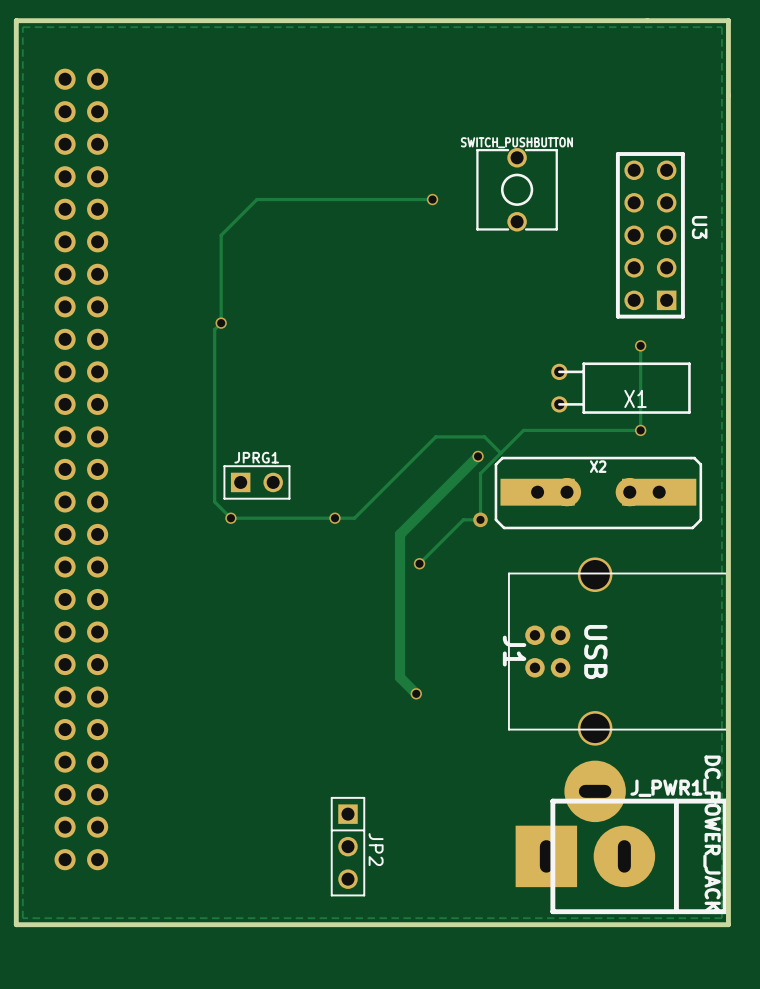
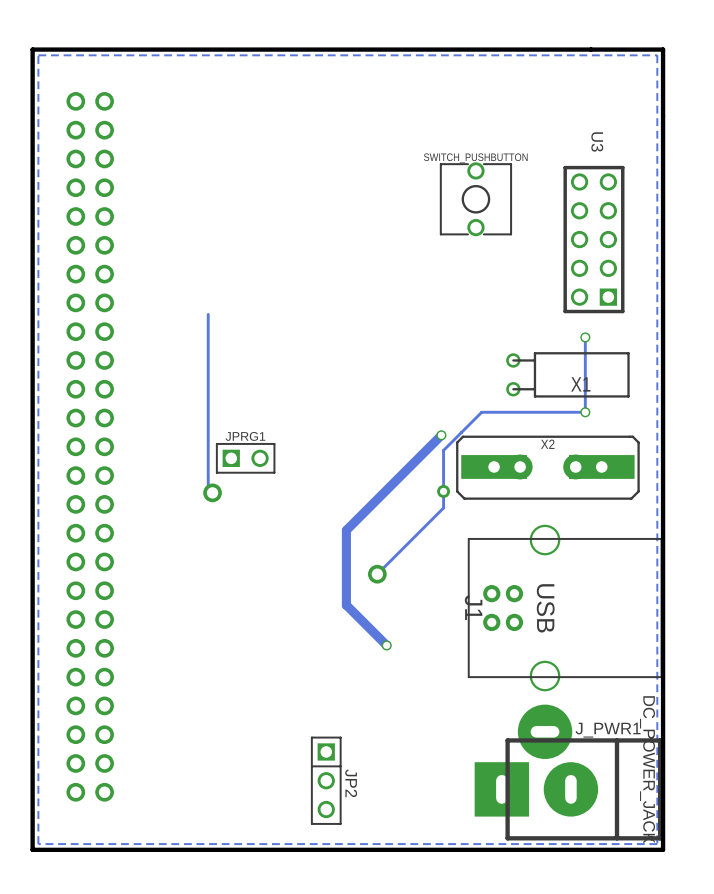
track: (432, 199) (256, 199) (221, 235) (221, 323) (214, 329) -> (208, 314) (208, 323)
via: (432, 199) -> none
U3 name position: U3 (699, 227) -> U3 (597, 141)
via: (221, 323) -> none
track: (500, 453) (484, 436) (435, 436) (354, 518) (230, 518) (214, 501) -> (212, 492) (208, 488) (208, 475)
via size: [225, 512, 237, 524] -> [203, 483, 222, 503]
via: (334, 518) -> none
track: (480, 519) (463, 519) (419, 563) -> (443, 491) (443, 508) (377, 574)
track: (400, 534) (400, 677) -> (372, 504) (346, 530) (346, 605) (372, 631)
via: (419, 563) -> none
via: none -> (377, 574)

